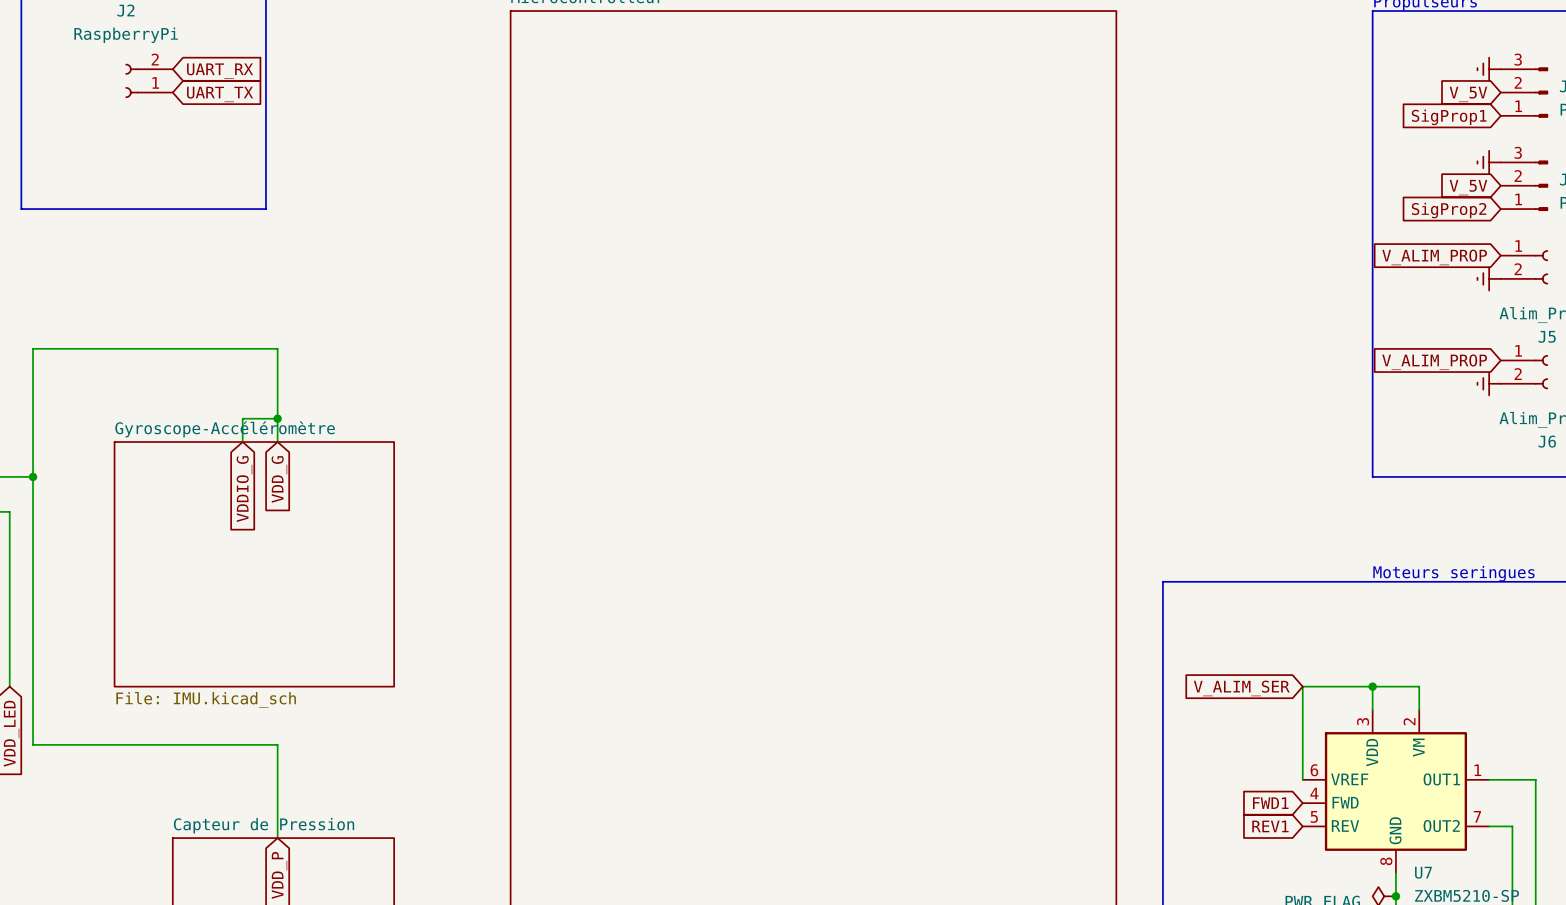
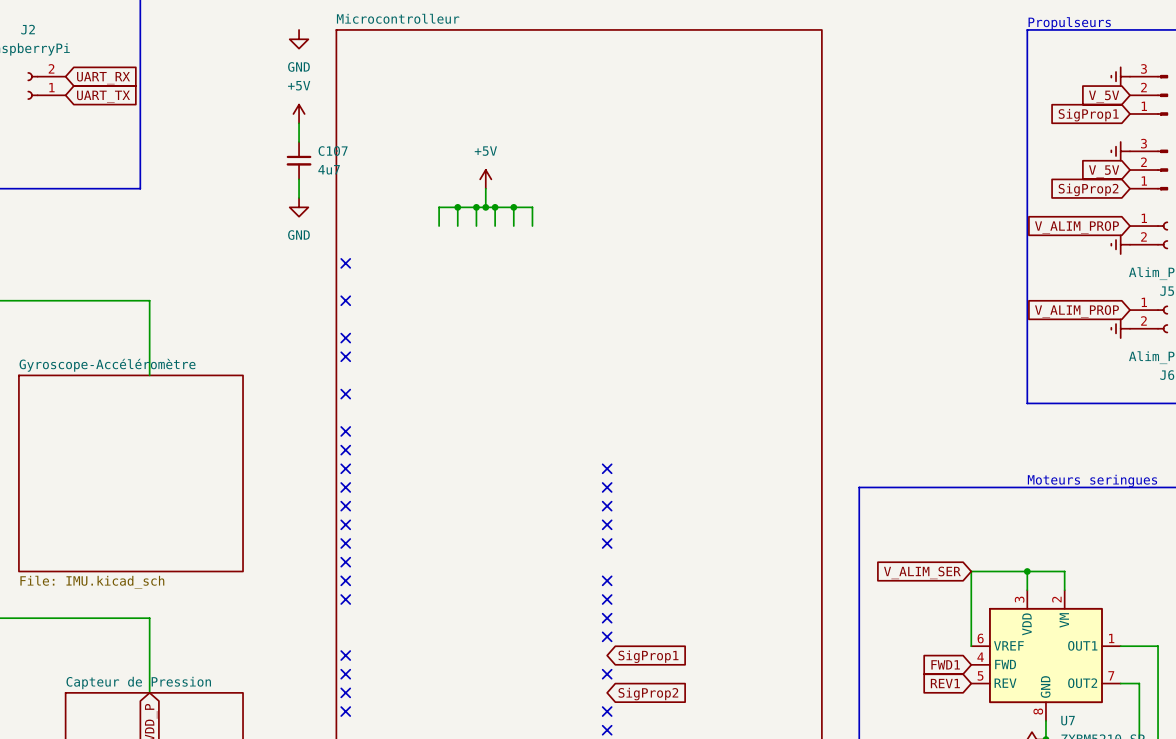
power symbol: none -> GND (299, 39)
power symbol: none -> +5V (299, 113)
wire: none -> (299, 123) (299, 142)
C107: none -> 4u7 (299, 160)
wire: none -> (299, 179) (299, 198)
power symbol: none -> +5V (485, 179)
wire: none -> (485, 188) (485, 207)
power symbol: none -> GND (299, 207)
wire: none -> (457, 207) (457, 226)
junction: none -> (457, 207)
wire: none -> (476, 207) (476, 226)
junction: none -> (476, 207)
junction: none -> (485, 207)
wire: none -> (495, 207) (495, 226)
junction: none -> (495, 207)
wire: none -> (513, 207) (513, 226)
junction: none -> (513, 207)
wire: none -> (439, 226) (439, 207) (532, 207) (532, 226)
no-connect mark: none -> (345, 263)
no-connect mark: none -> (345, 300)
no-connect mark: none -> (345, 338)
wire: (277, 418) (242, 418) (242, 442) -> none
junction: (277, 418) -> none
no-connect mark: none -> (345, 356)
no-connect mark: none -> (345, 394)
global label: VDD_G (279, 479) -> none
global label: VDDIO_G (244, 489) -> none
no-connect mark: none -> (345, 431)
no-connect mark: none -> (345, 450)
no-connect mark: none -> (345, 468)
no-connect mark: none -> (607, 468)
no-connect mark: none -> (345, 487)
no-connect mark: none -> (607, 487)
no-connect mark: none -> (345, 506)
no-connect mark: none -> (607, 506)
no-connect mark: none -> (345, 524)
no-connect mark: none -> (607, 524)
no-connect mark: none -> (345, 543)
no-connect mark: none -> (607, 543)
no-connect mark: none -> (345, 562)
no-connect mark: none -> (345, 580)
no-connect mark: none -> (607, 580)
no-connect mark: none -> (345, 599)
no-connect mark: none -> (607, 599)
no-connect mark: none -> (607, 618)
no-connect mark: none -> (607, 636)
no-connect mark: none -> (345, 655)
global label: none -> SigProp1 (648, 656)
no-connect mark: none -> (345, 674)
no-connect mark: none -> (607, 674)
no-connect mark: none -> (345, 692)
global label: none -> SigProp2 (648, 694)
no-connect mark: none -> (345, 711)
no-connect mark: none -> (607, 711)
no-connect mark: none -> (607, 730)

